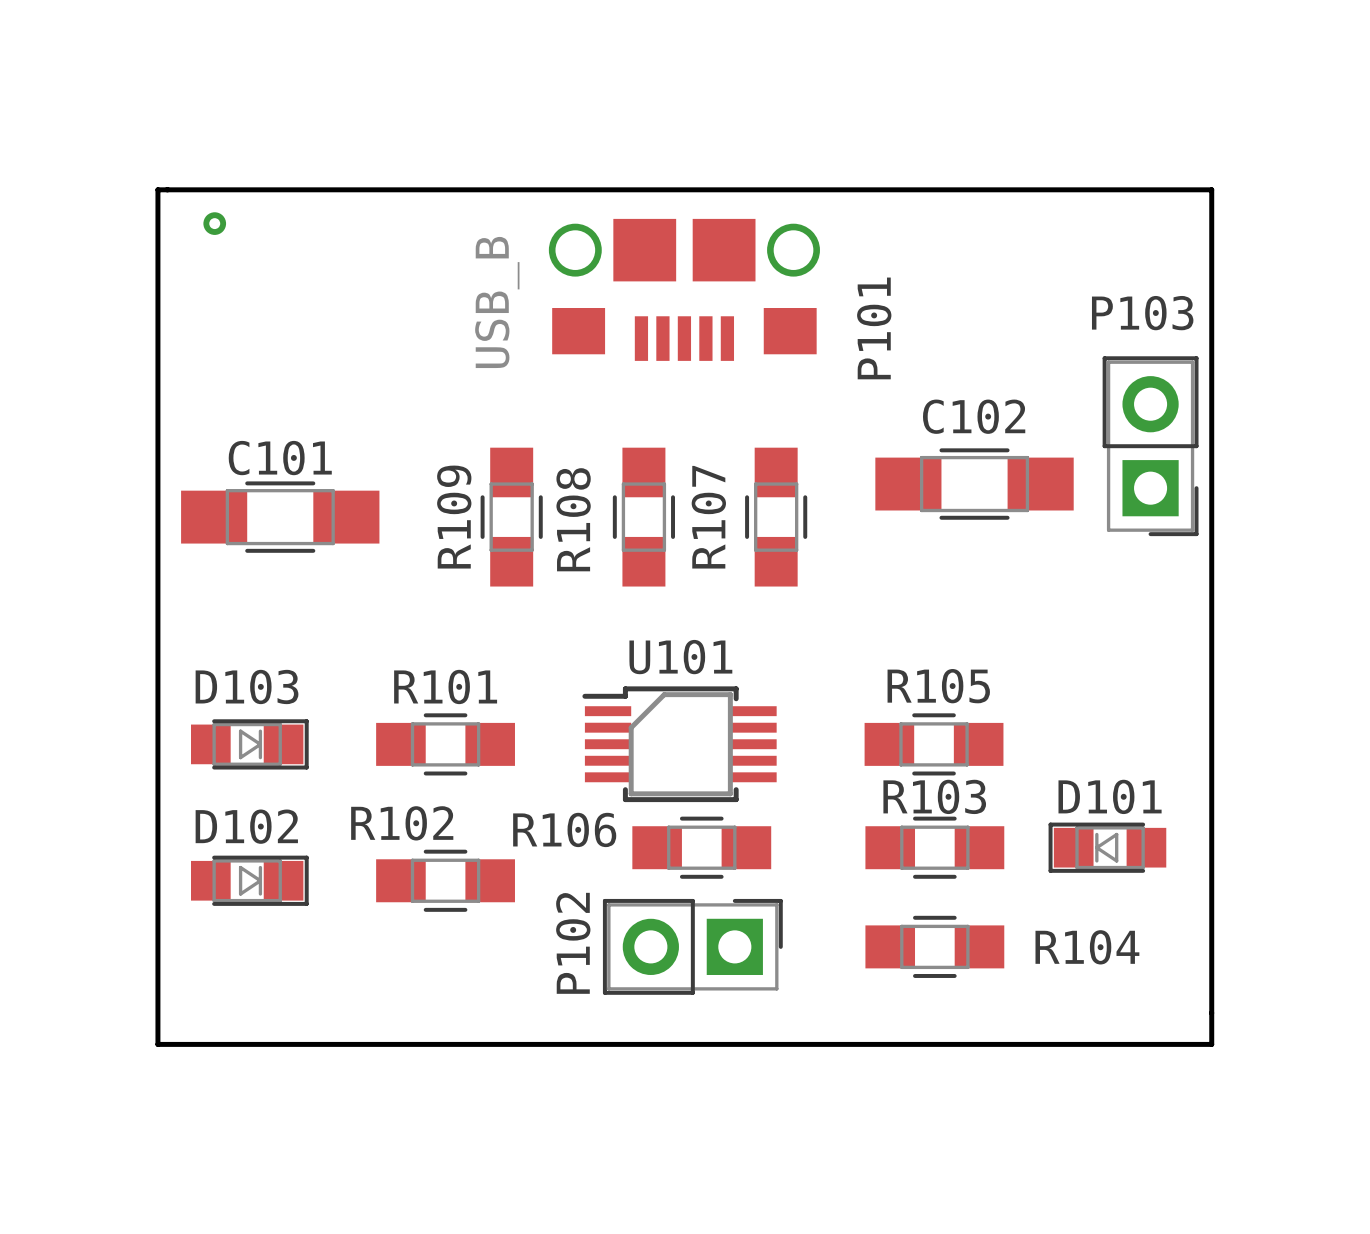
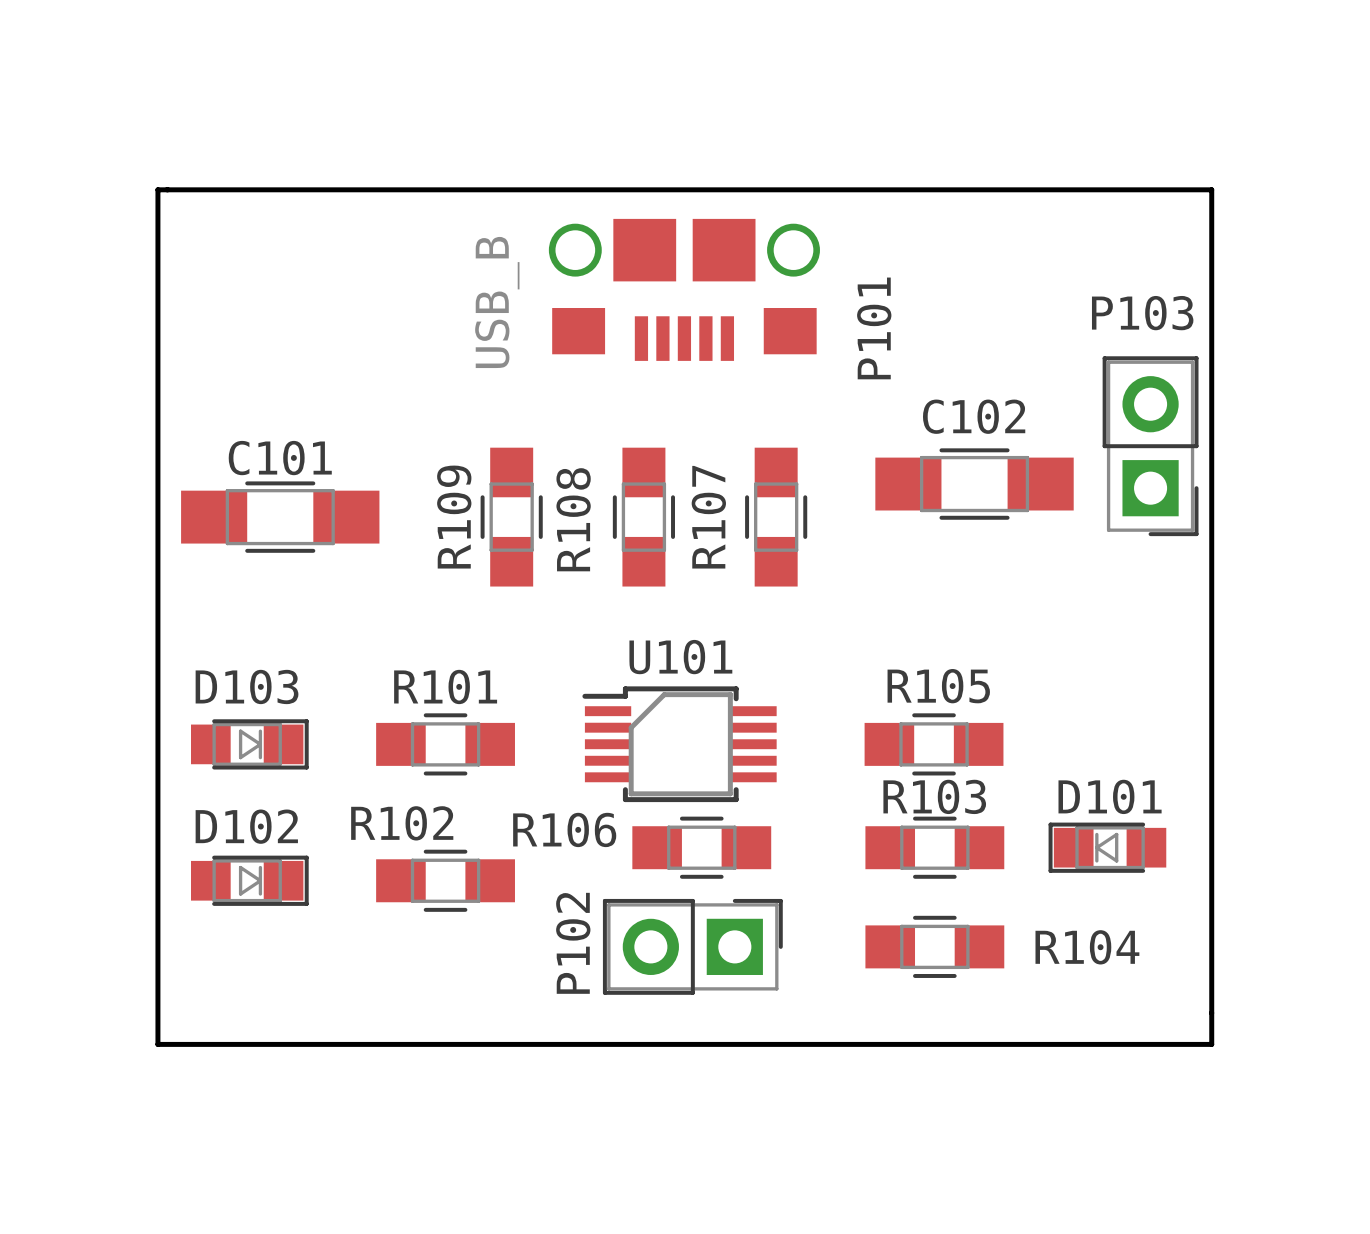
part: (214, 223) -> none

